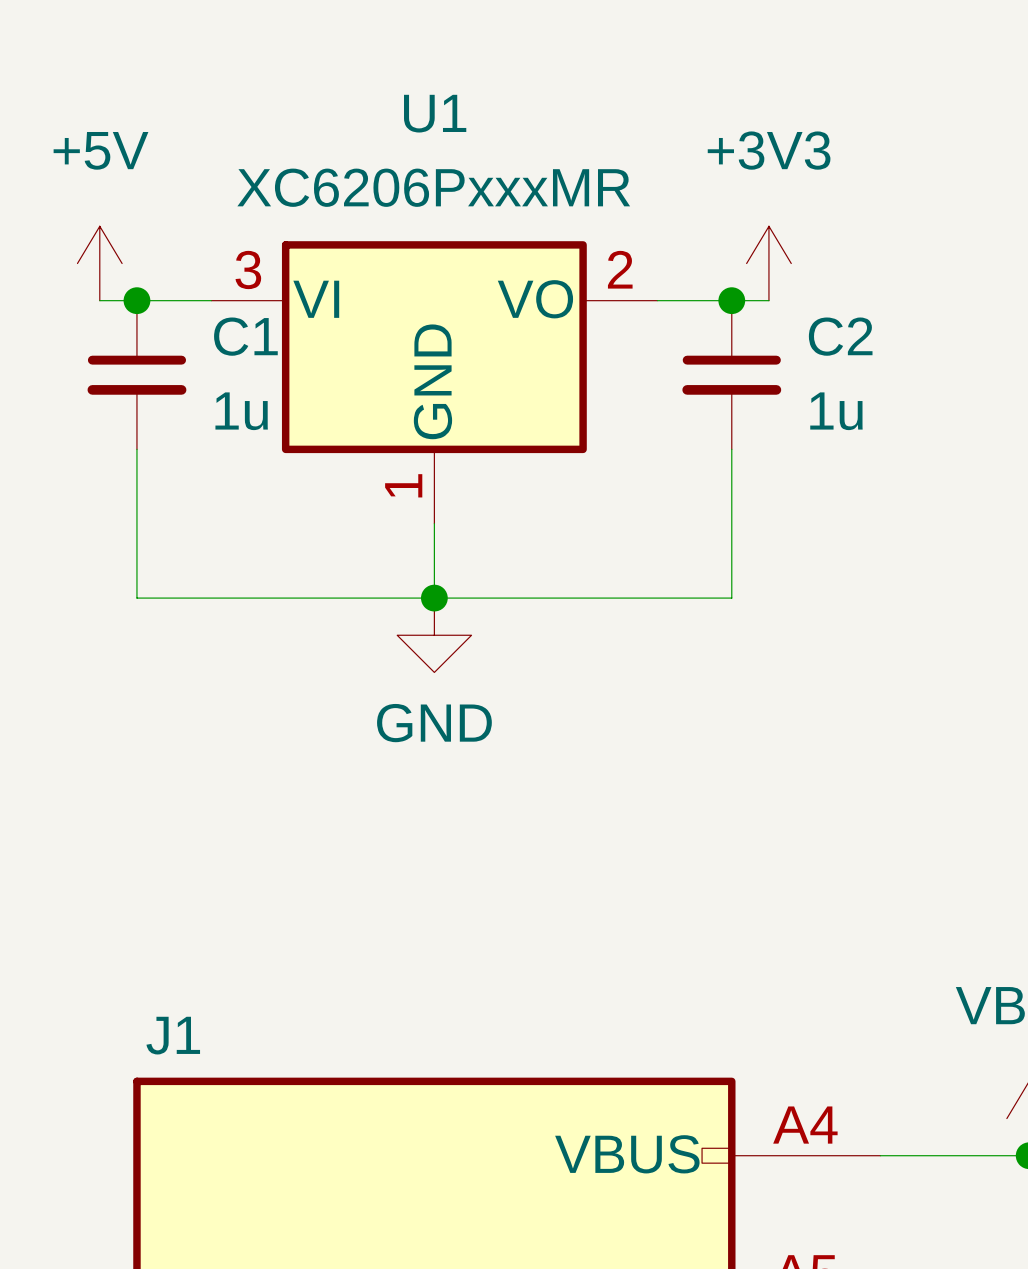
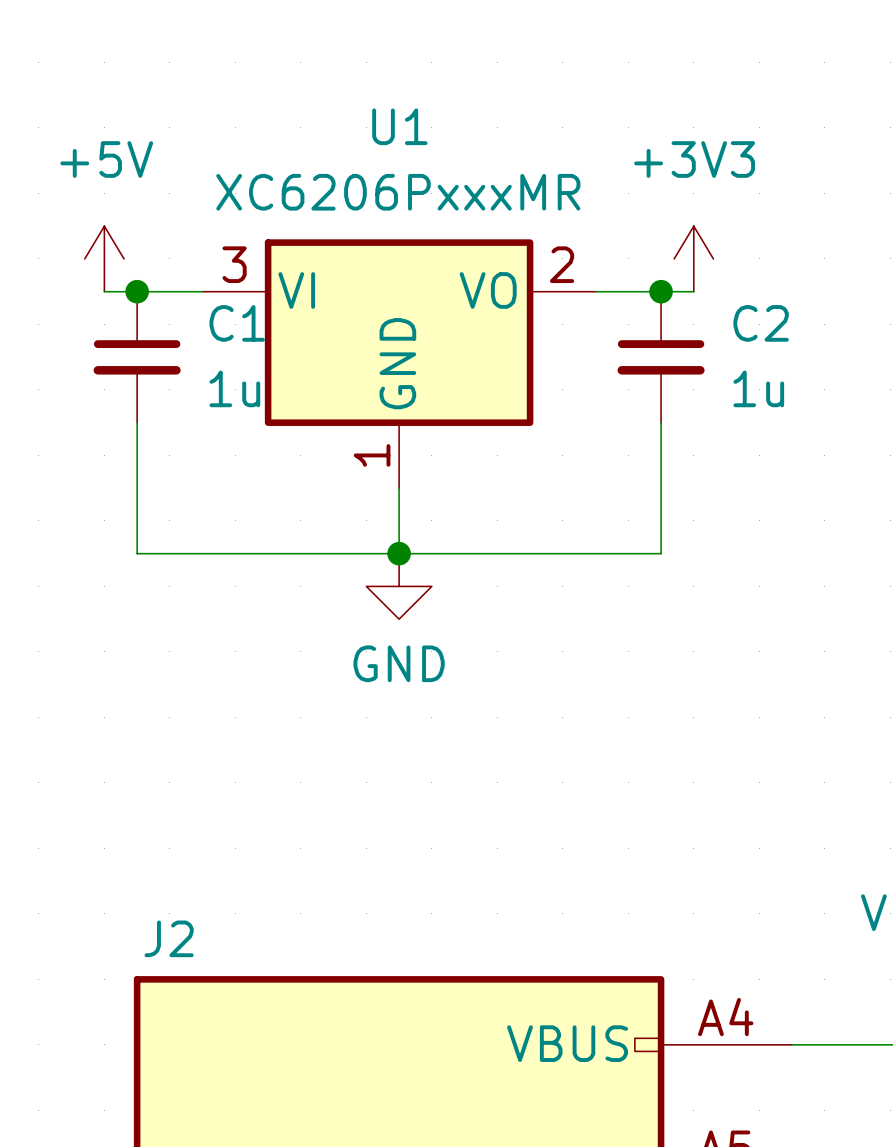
J1 name: J1 (173, 1035) -> J2 (169, 938)

